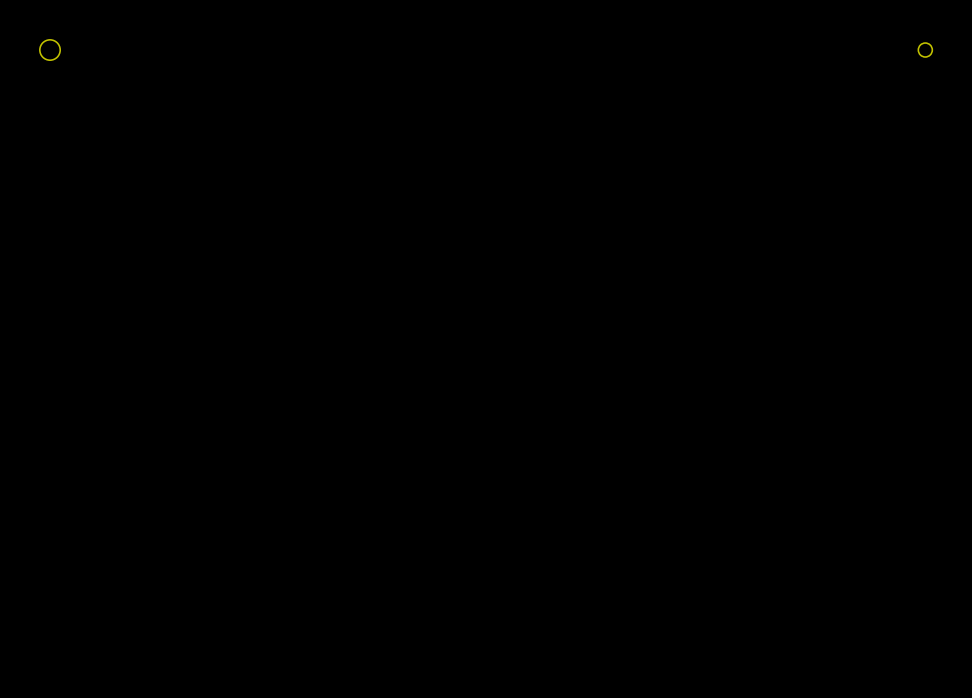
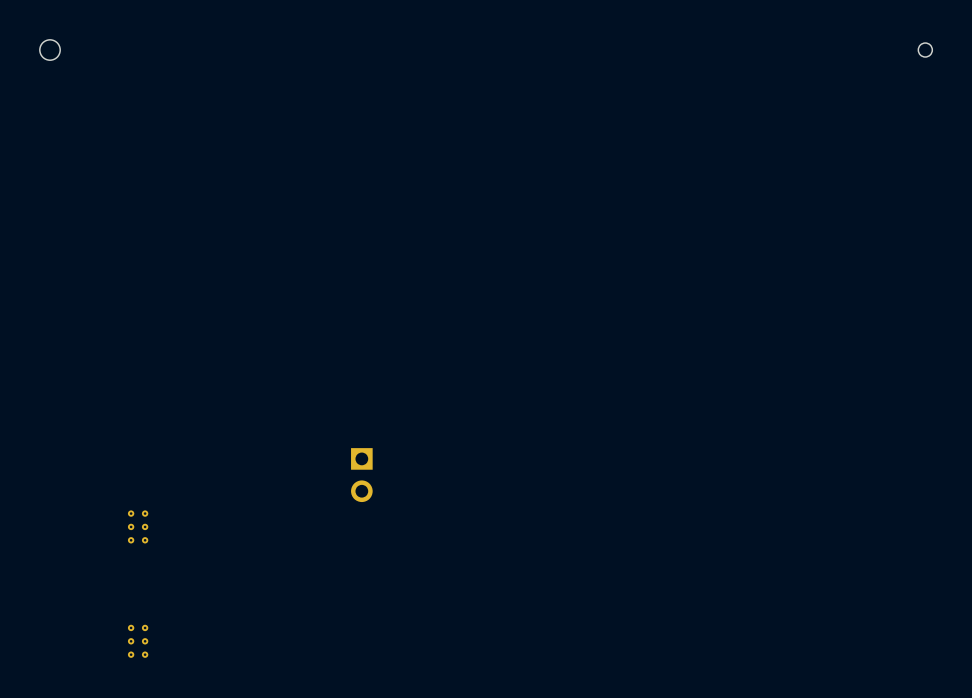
part: none -> (361, 475)
part: none -> (138, 526)
part: none -> (138, 641)

